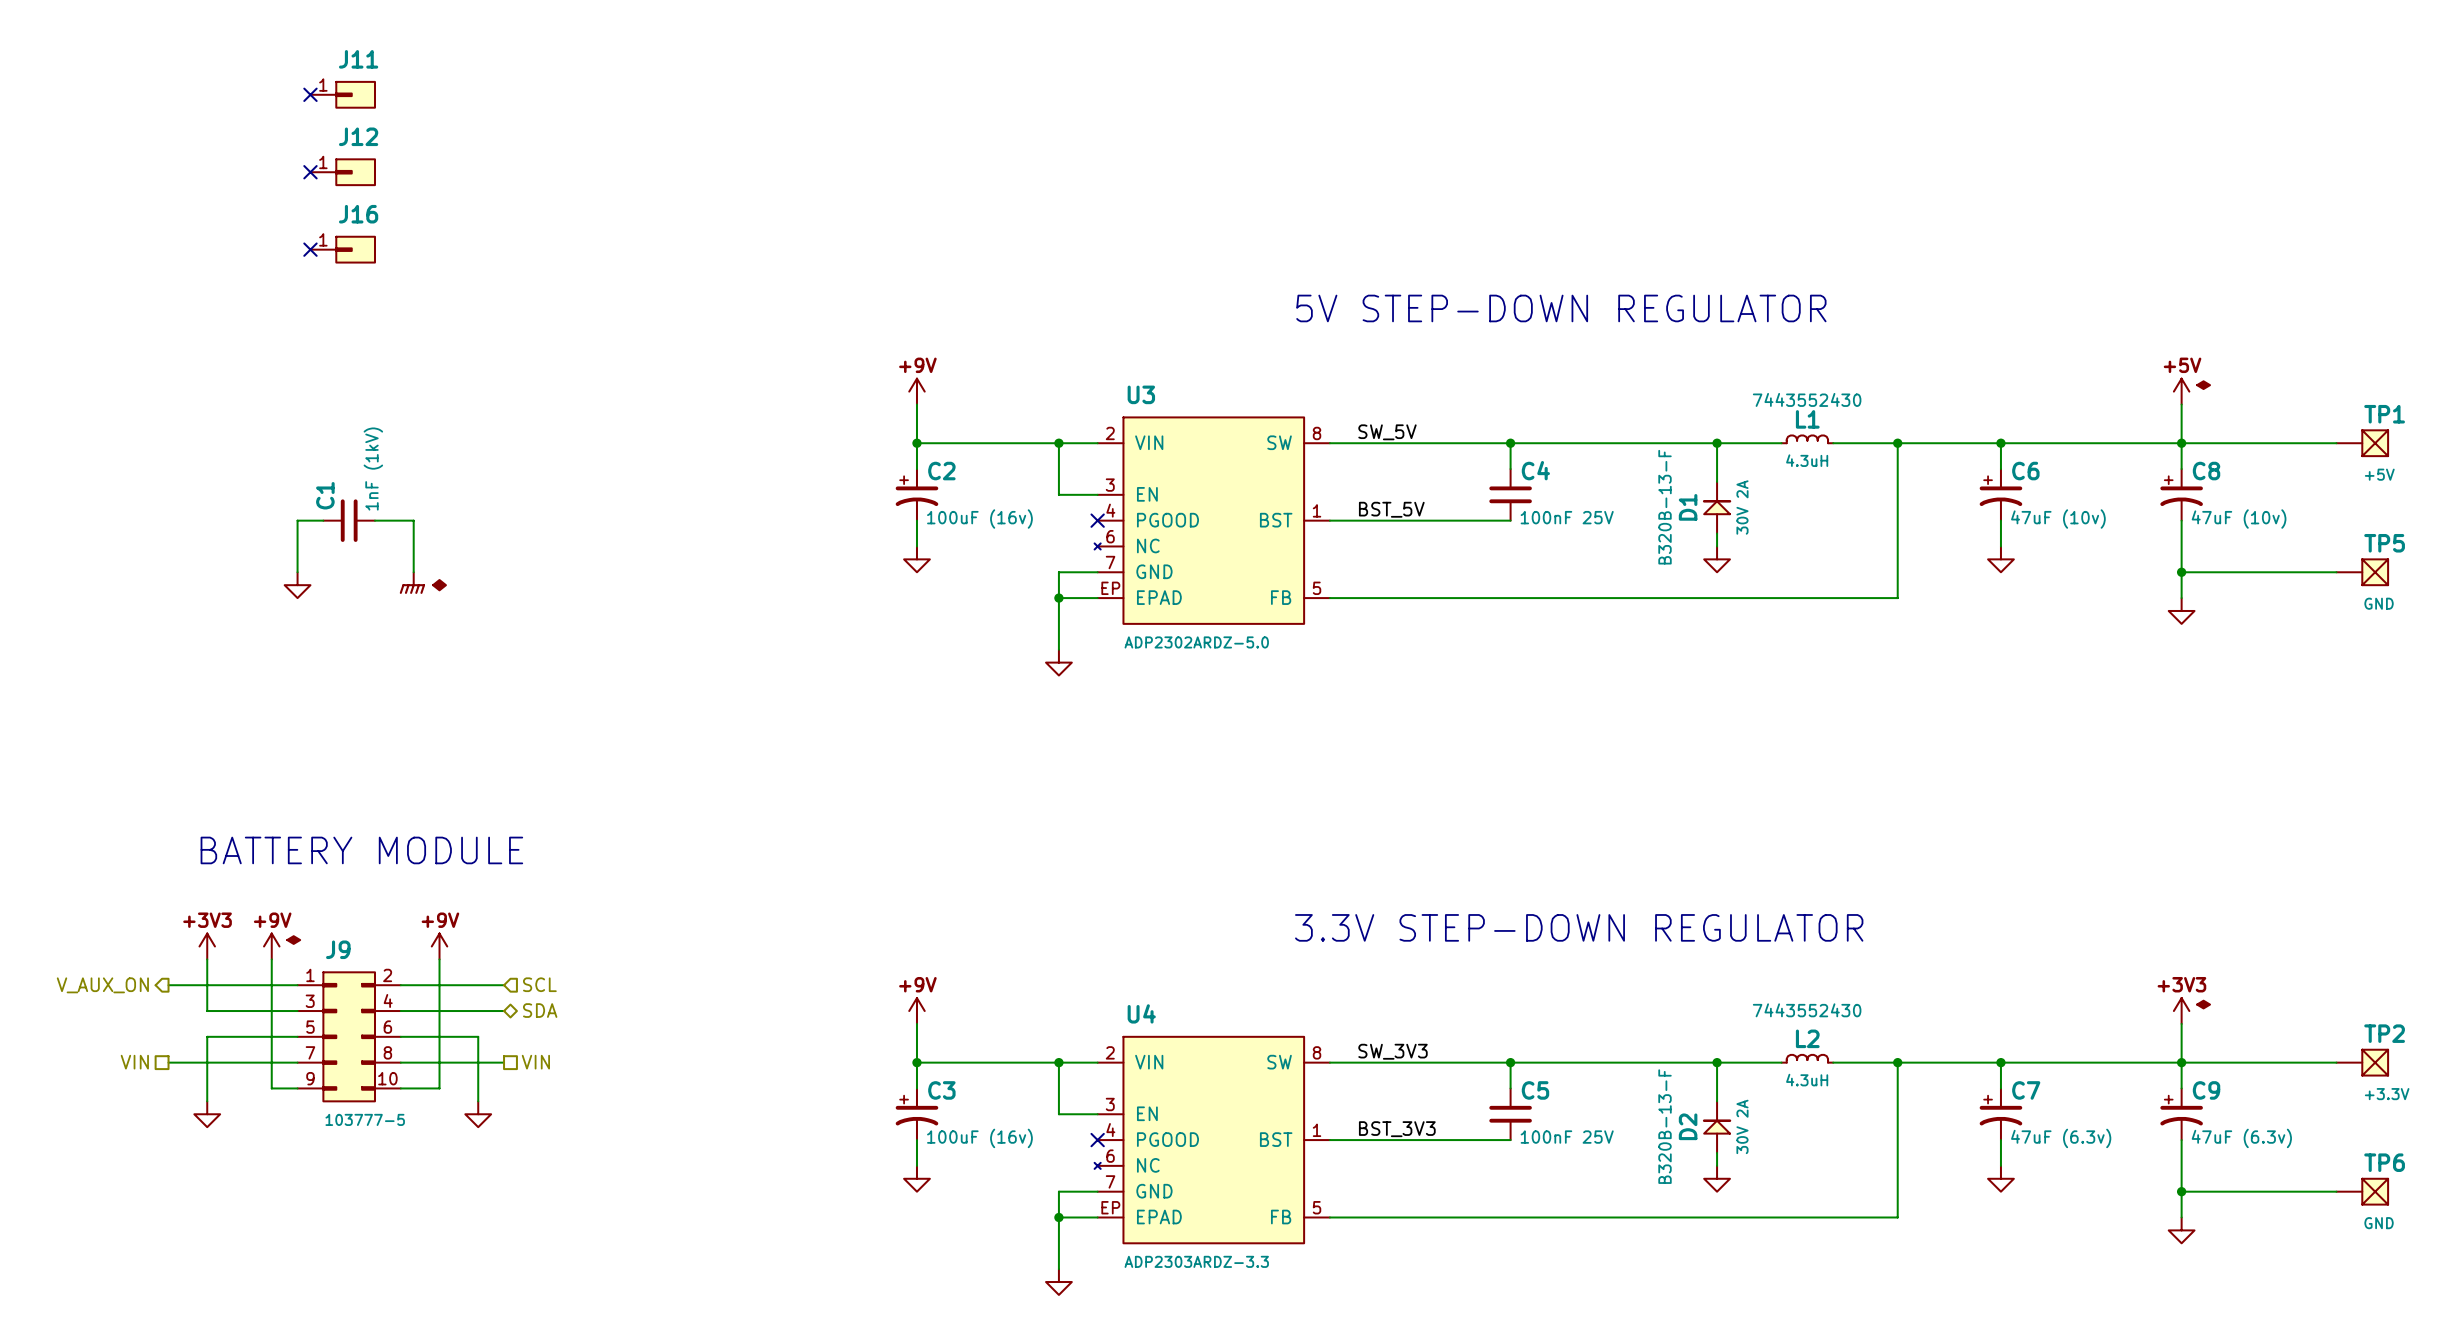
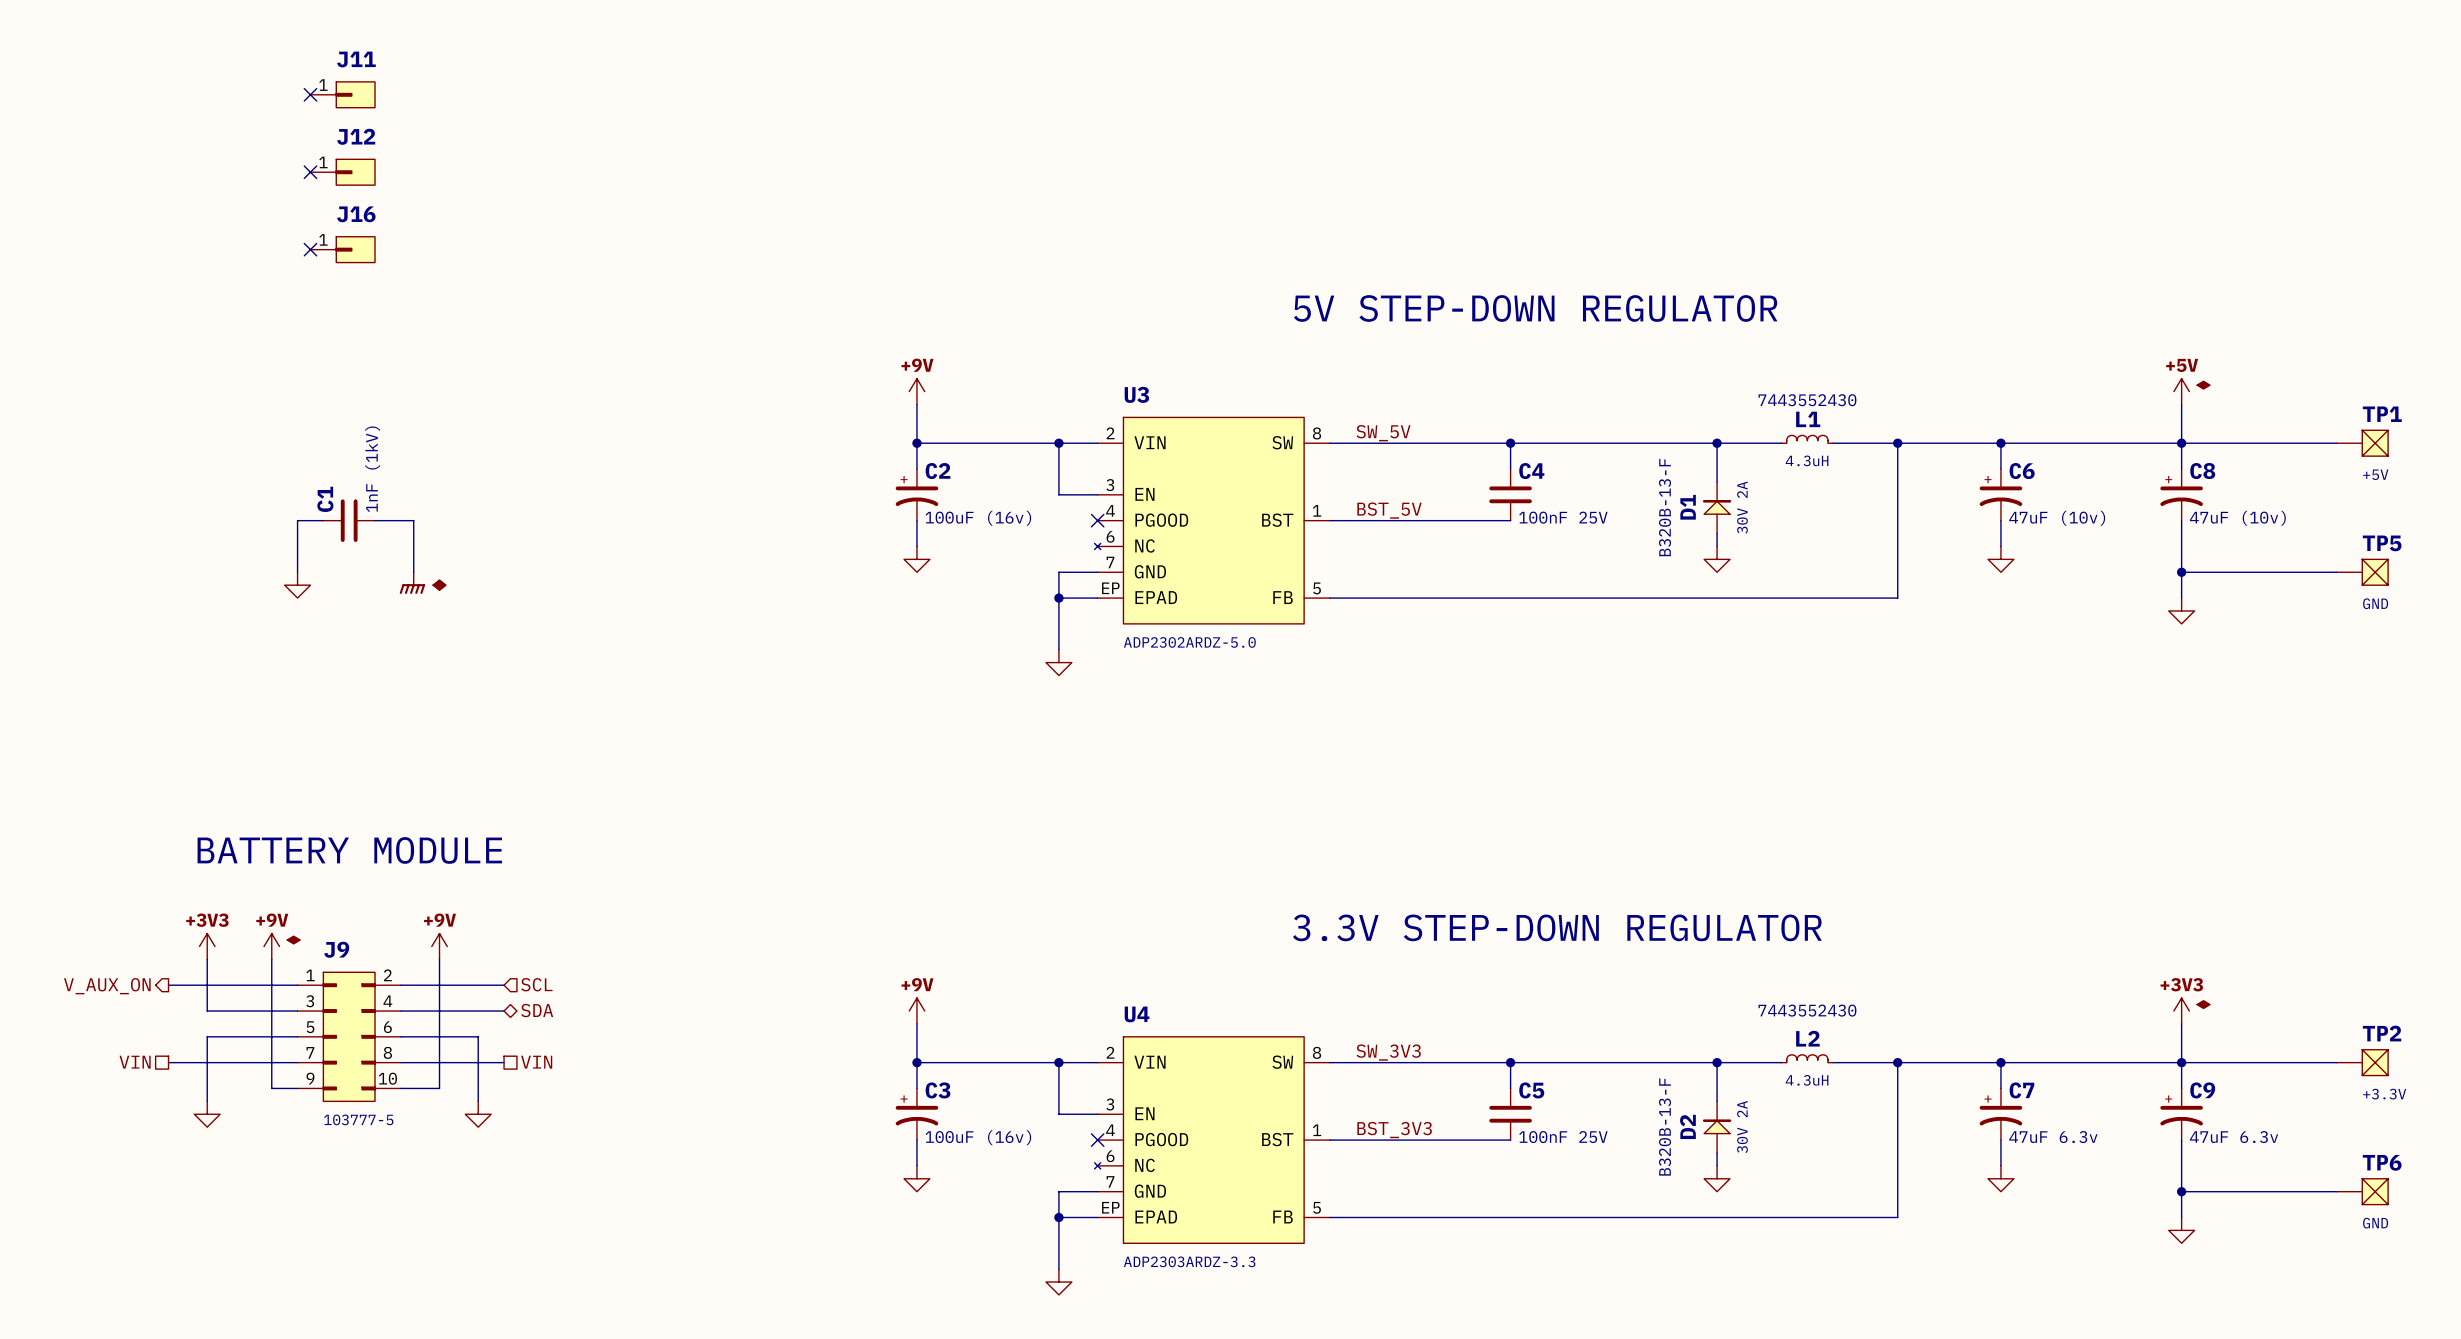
C7 value: 47uF (6.3v) (2061, 1138) -> 47uF 6.3v (2053, 1137)
C9 value: 47uF (6.3v) (2241, 1138) -> 47uF 6.3v (2234, 1137)

